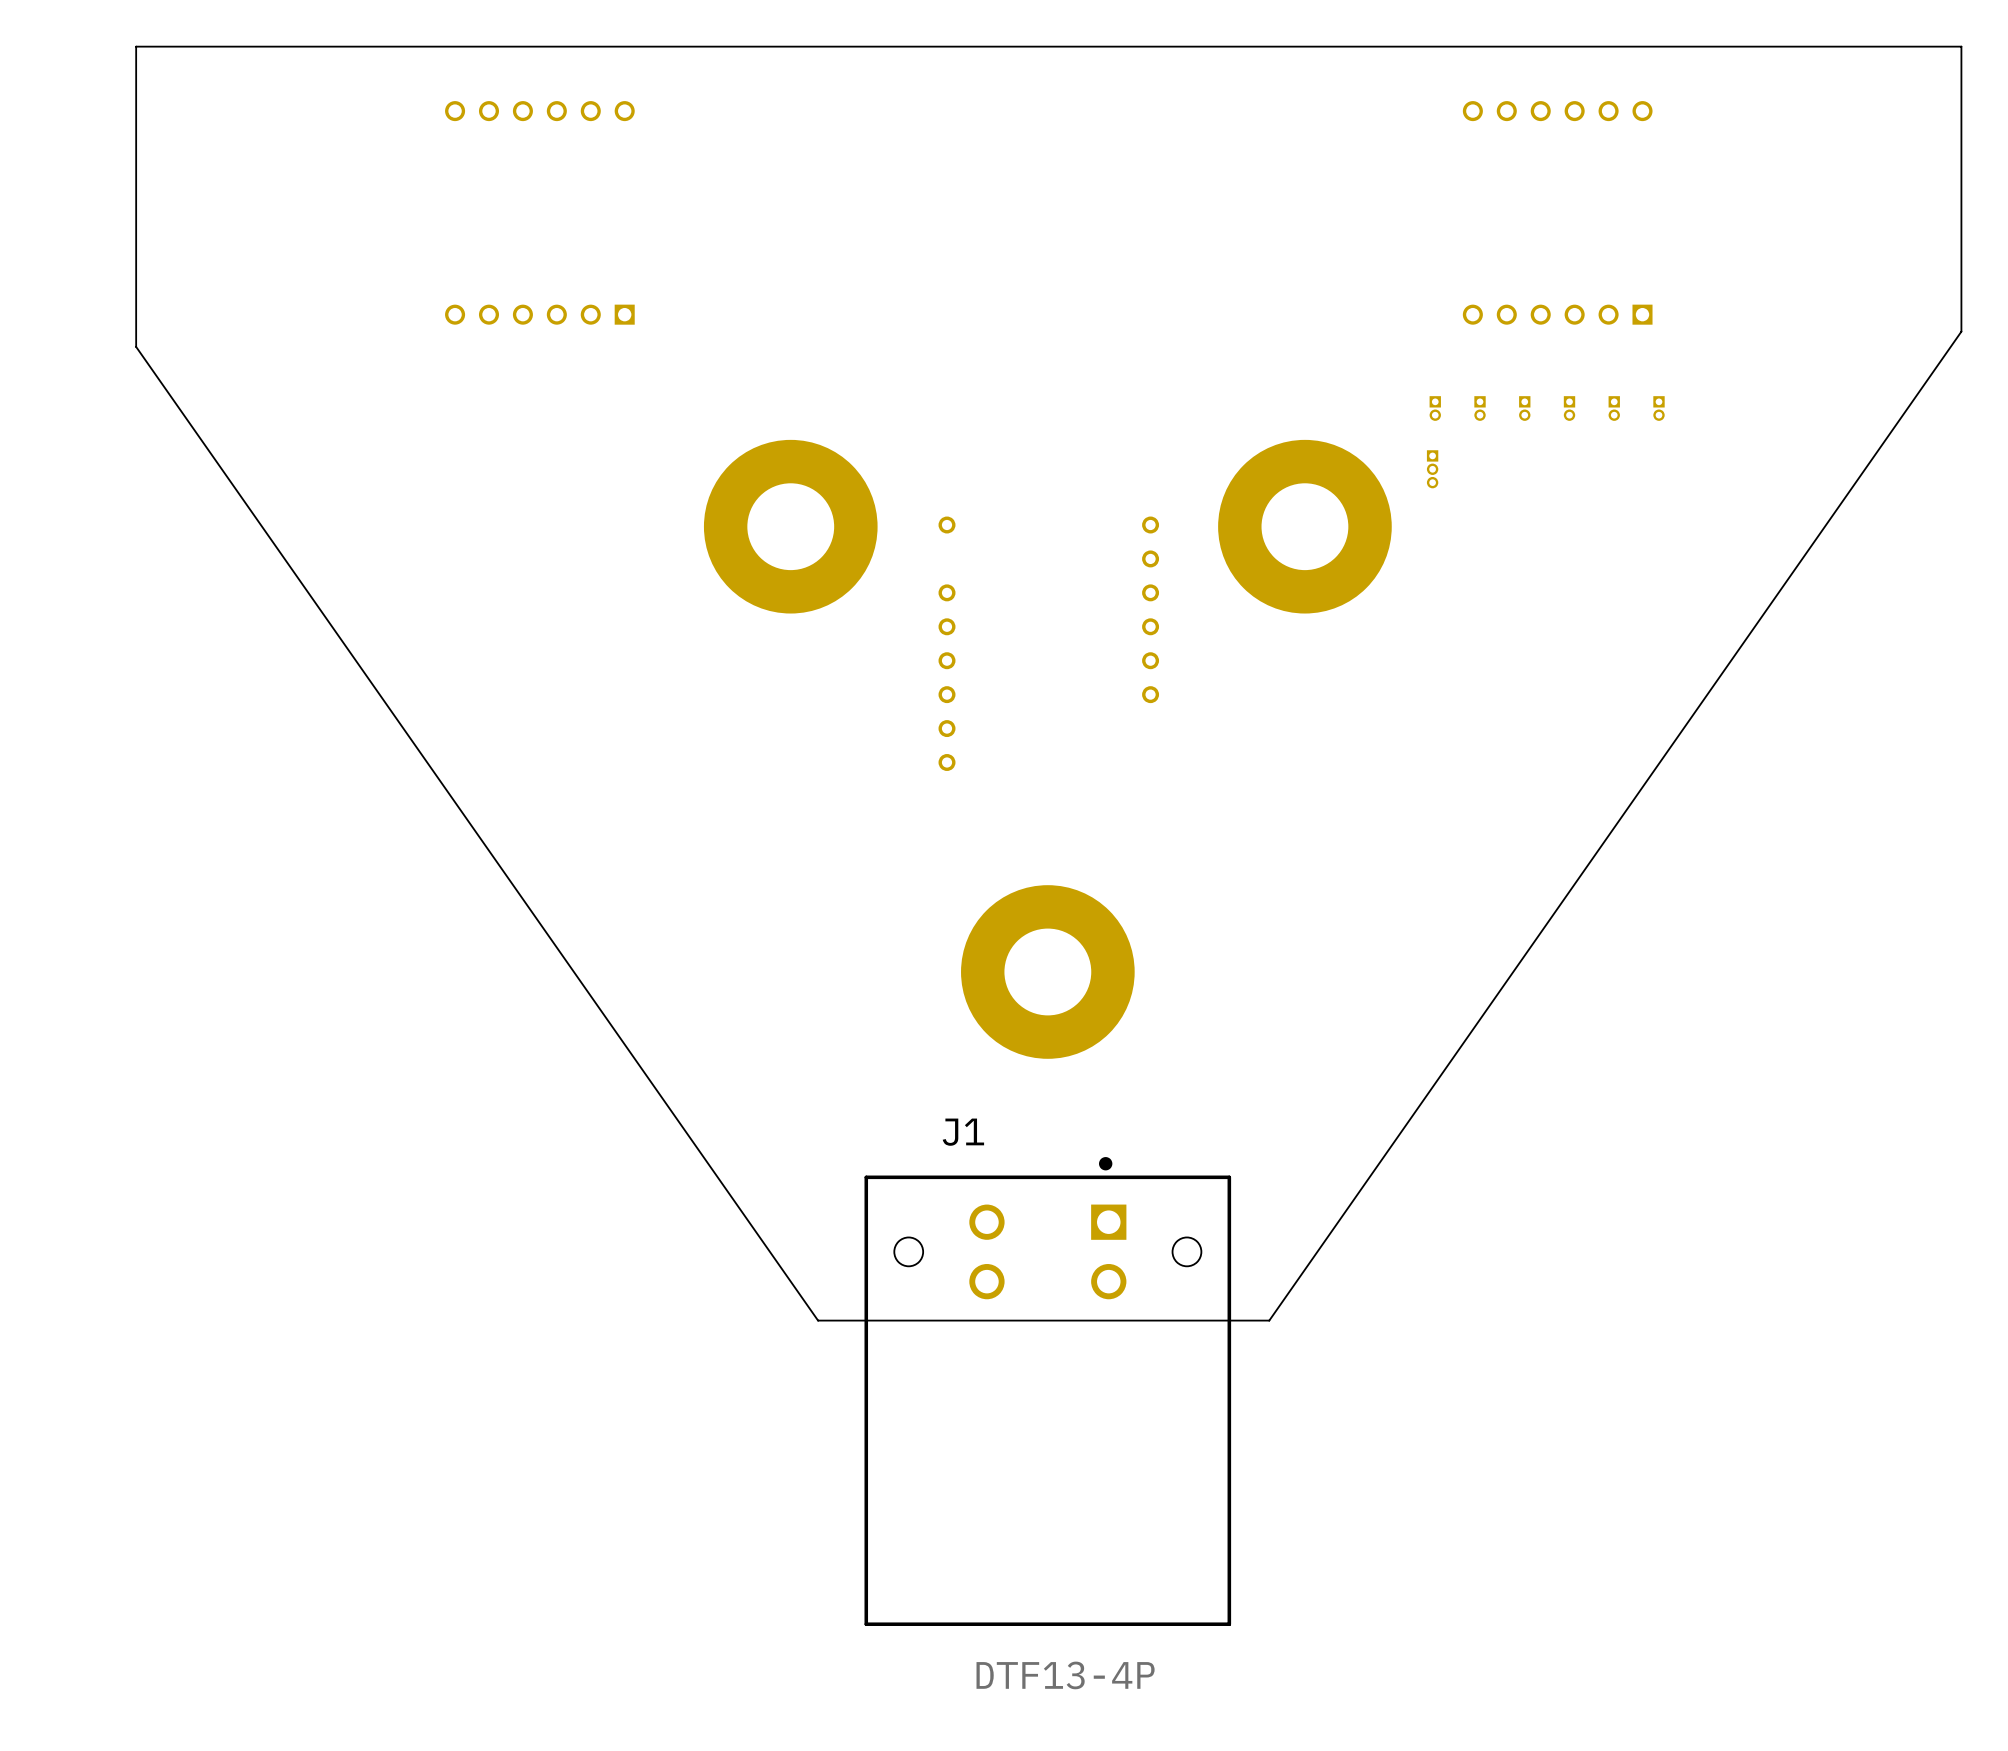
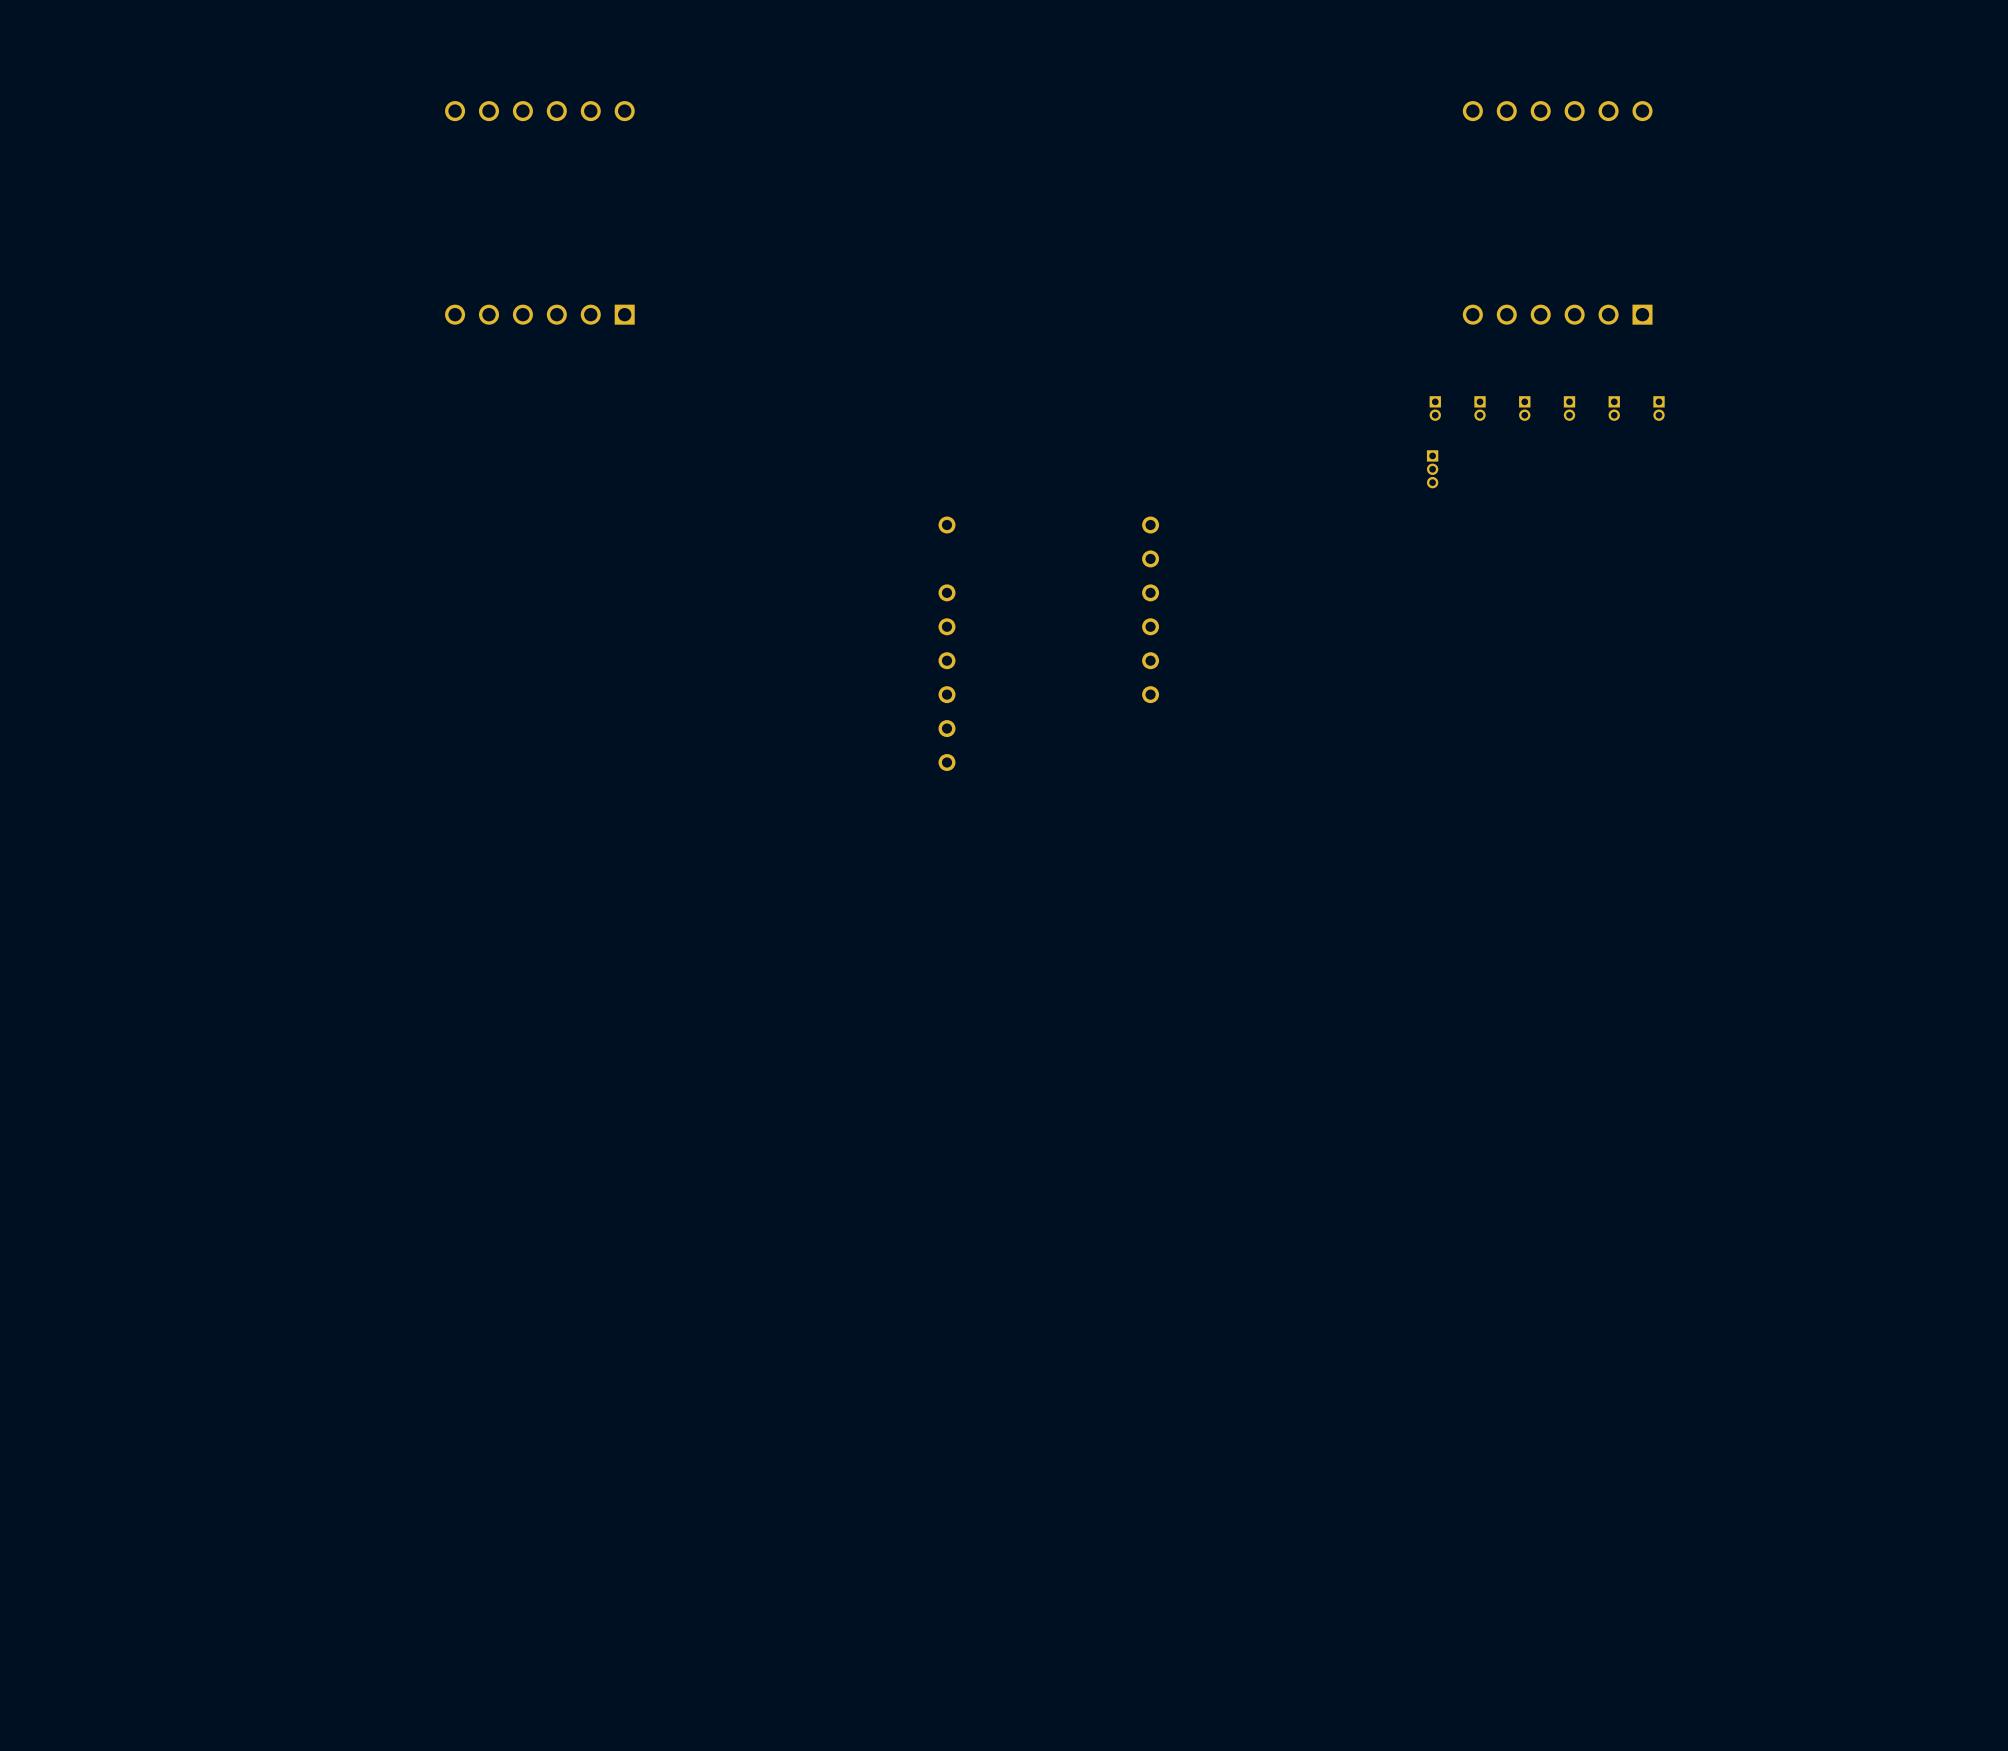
board edge: (1961, 46) (1961, 331) (1269, 1320) (818, 1320) (136, 346) (136, 46) (1961, 46) -> none
part: (790, 526) -> none
part: (1304, 526) -> none
part: (1047, 971) -> none
J1: DTF13-4P (1047, 1391) -> none

